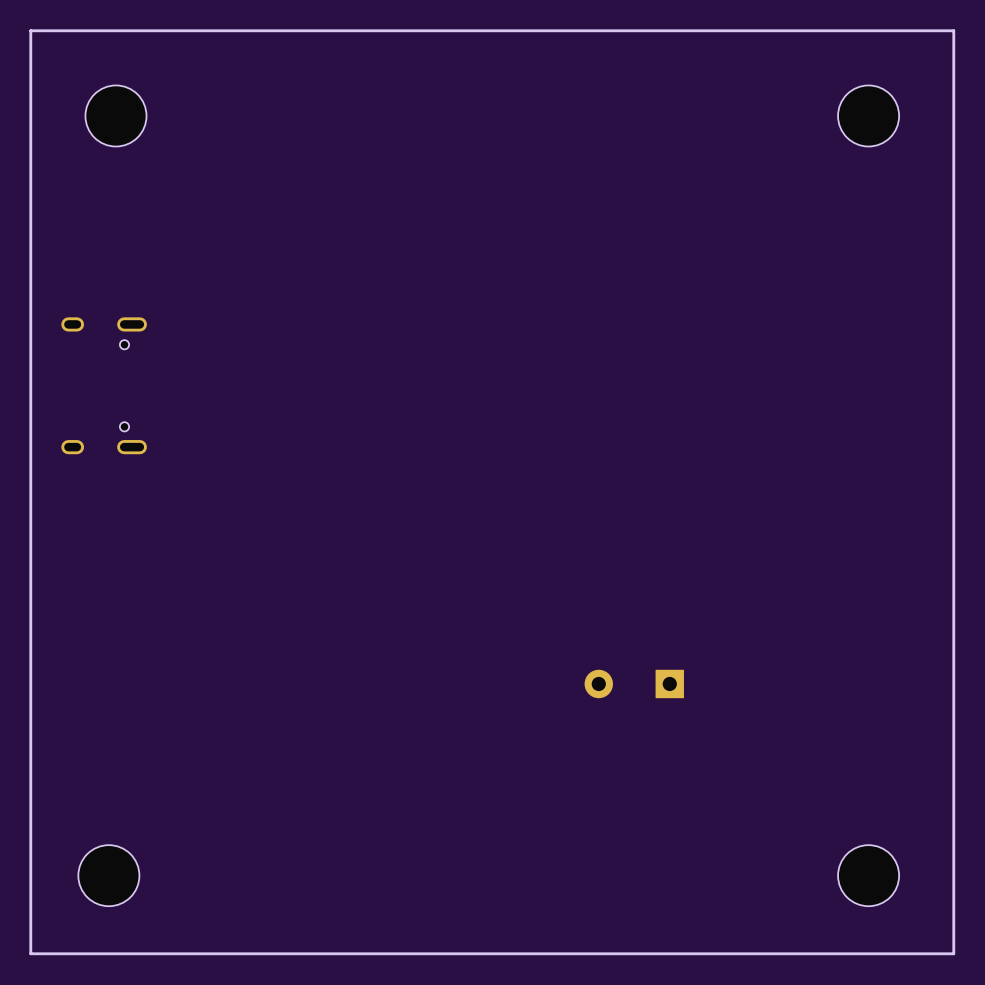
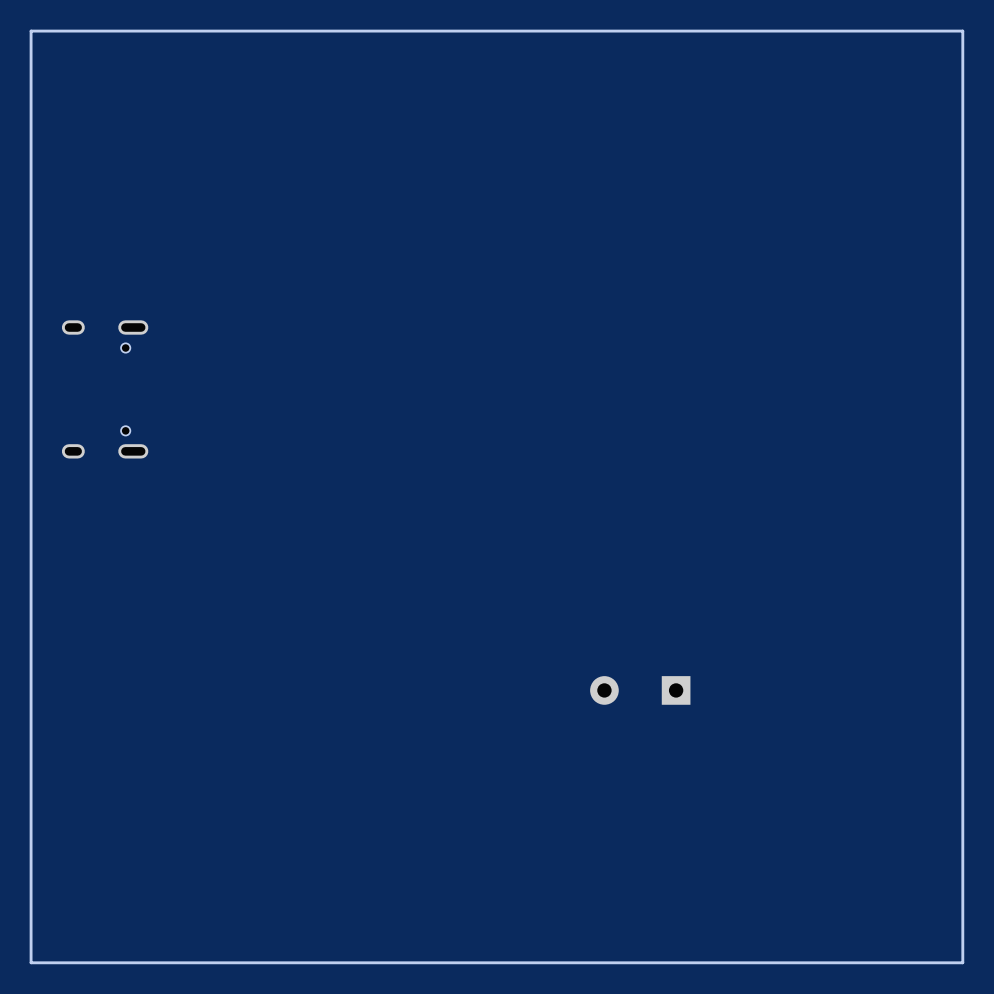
part: (115, 115) -> none
part: (868, 115) -> none
part: (108, 875) -> none
part: (868, 875) -> none

